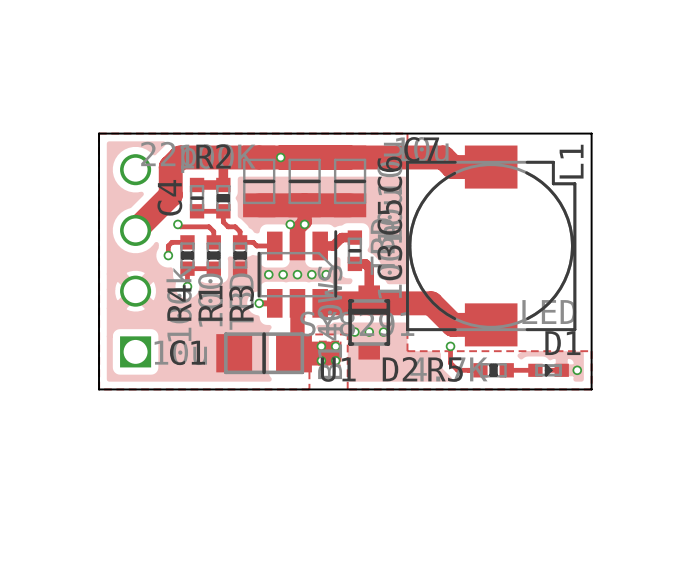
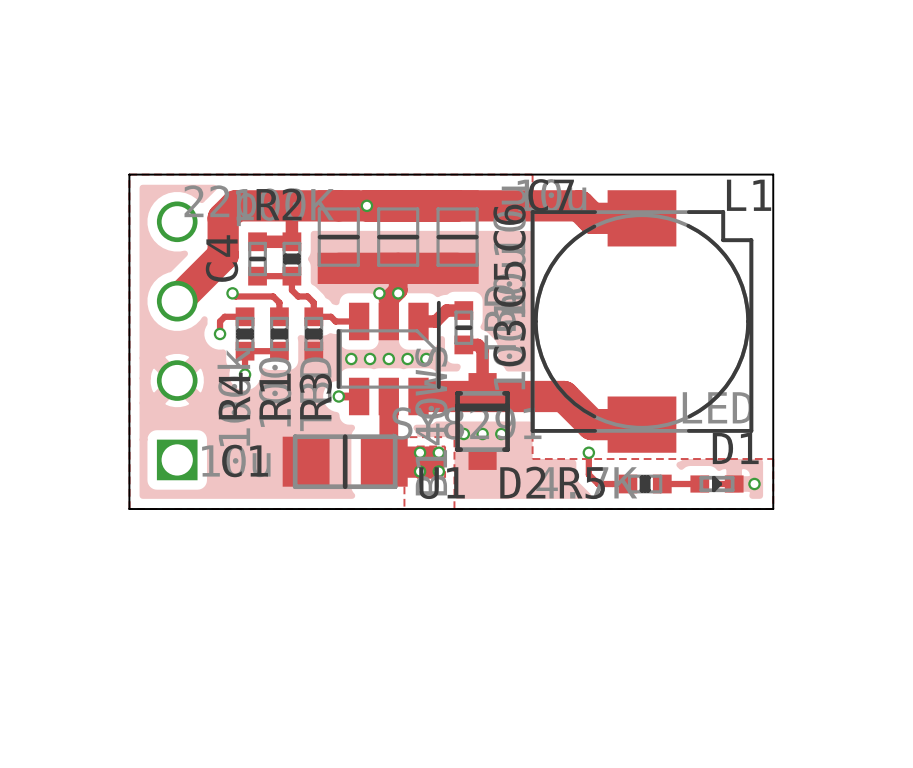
L1 name rotation: 0° (571, 161) -> 90° clockwise (749, 195)

